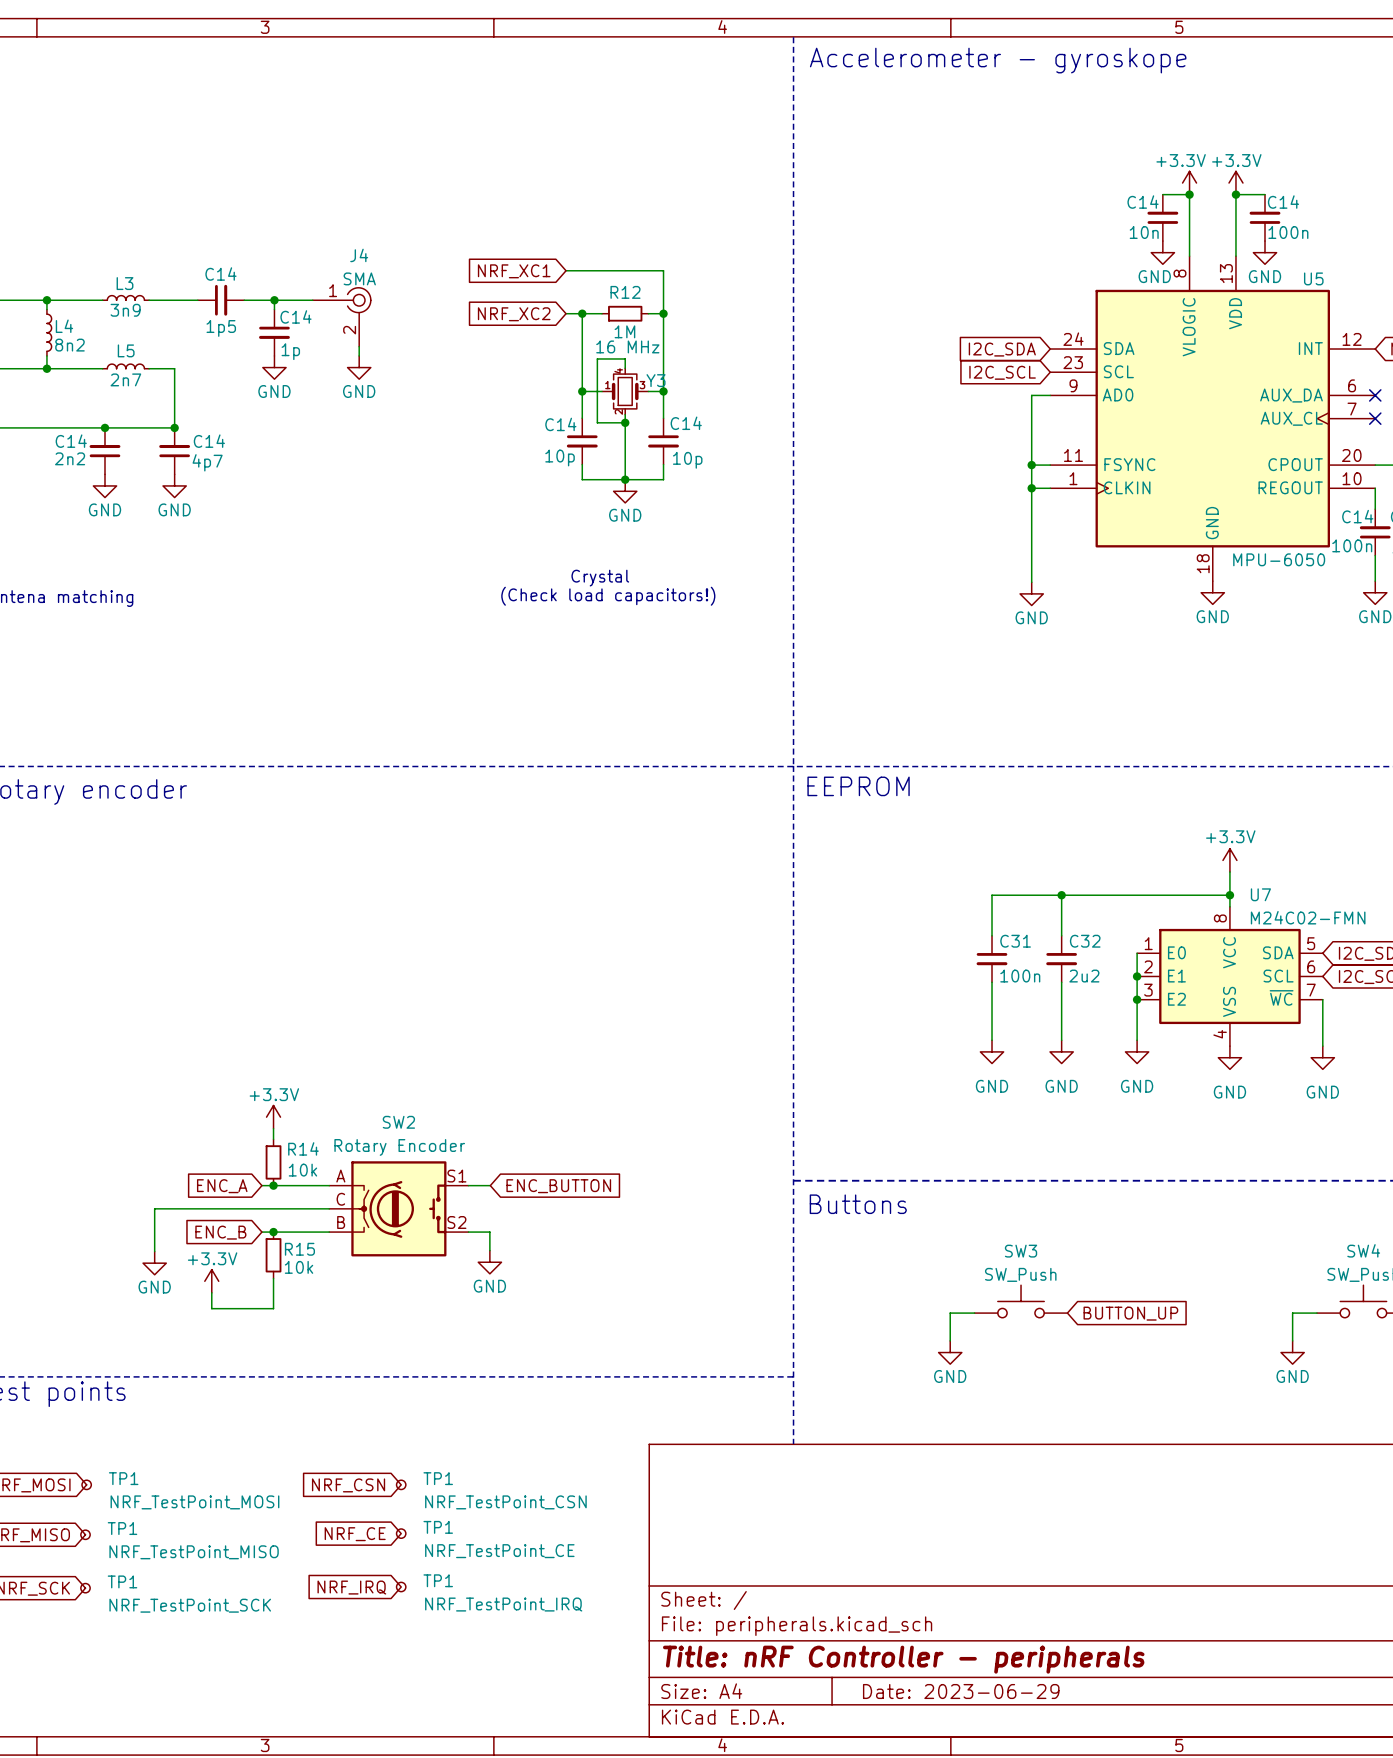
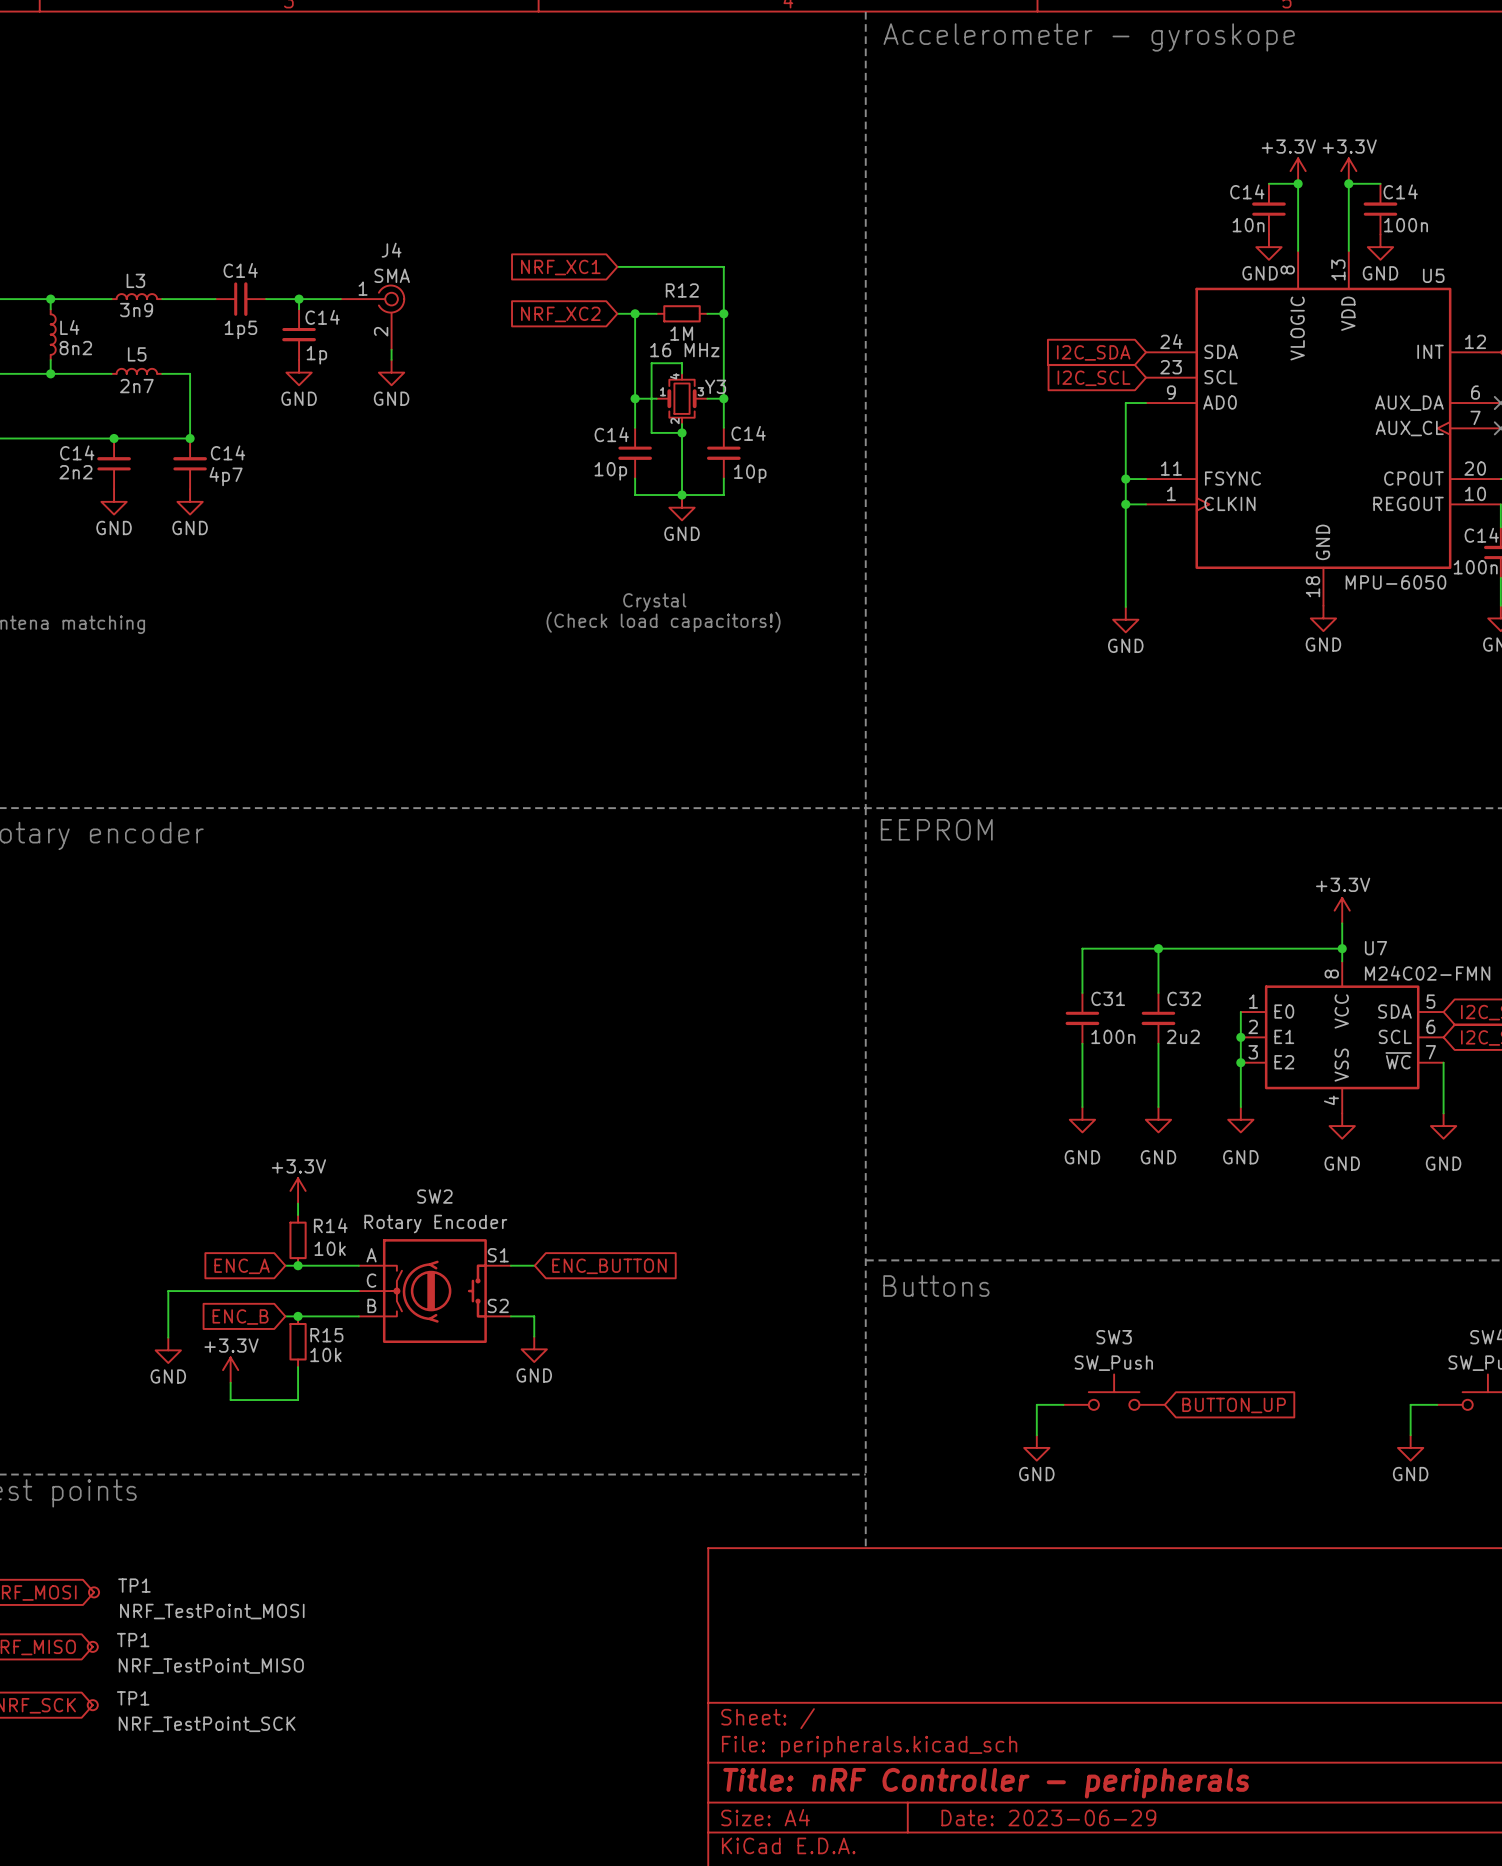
TP1: NRF_TestPoint_CSN (401, 1484) -> none
global label: NRF_CSN (348, 1485) -> none
TP1: NRF_TestPoint_CE (401, 1533) -> none
global label: NRF_CE (355, 1534) -> none
global label: NRF_IRQ (351, 1587) -> none
TP1: NRF_TestPoint_IRQ (401, 1587) -> none

